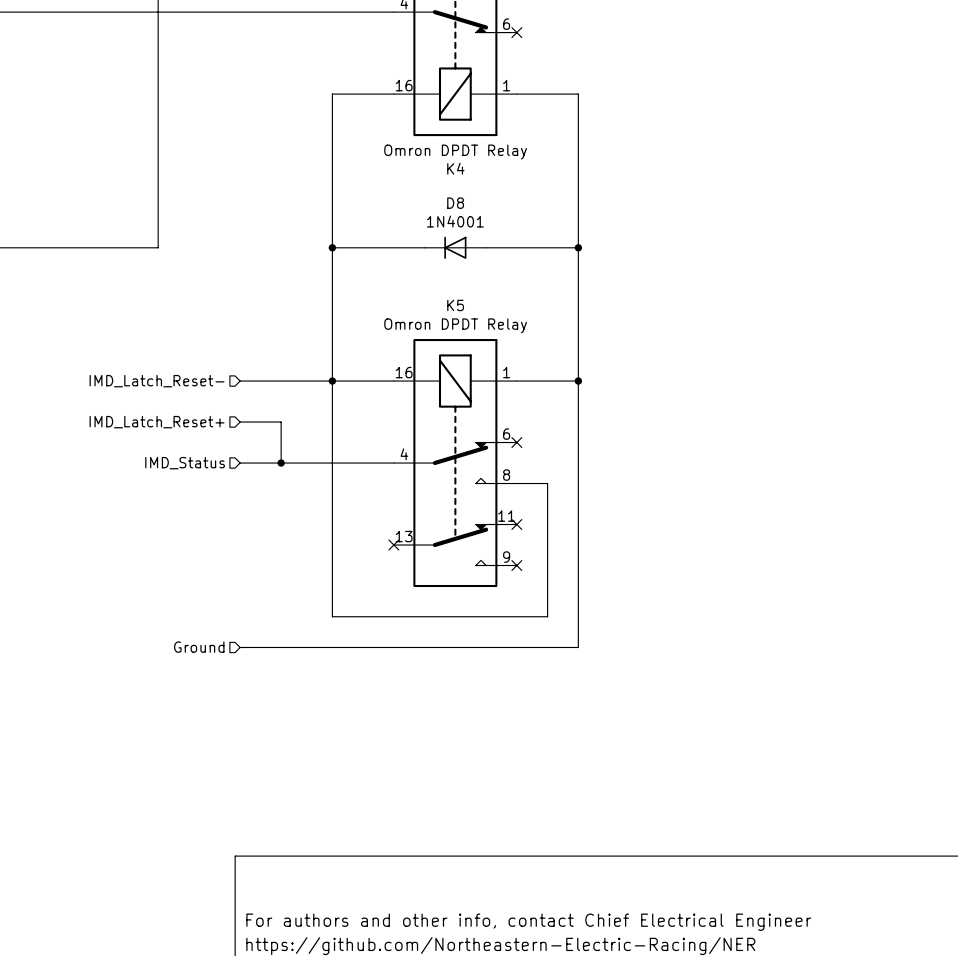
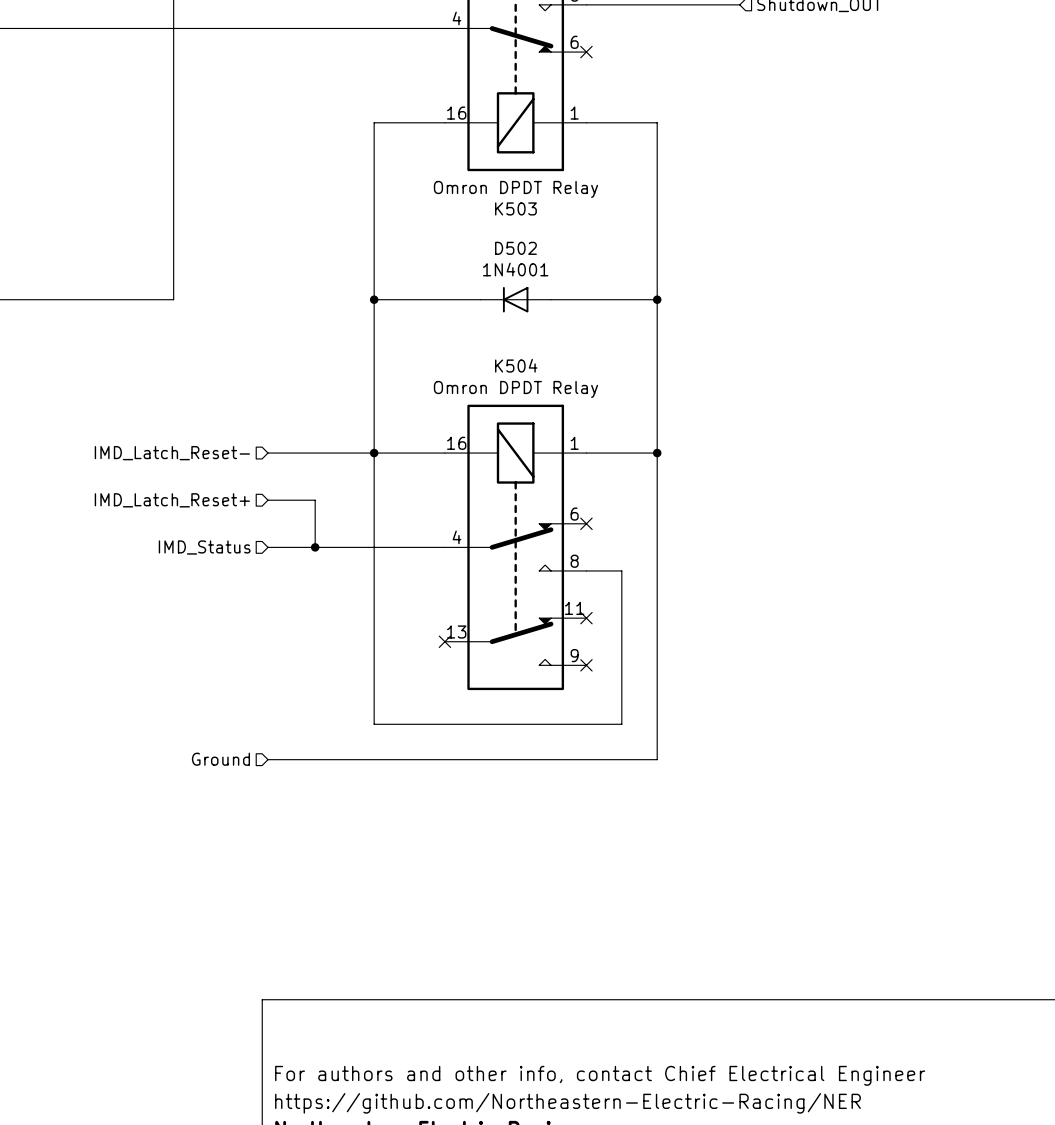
K4 name: K4 (455, 168) -> K503 (515, 208)
D8 name: D8 (455, 203) -> D502 (515, 248)
K5 name: K5 (455, 305) -> K504 (516, 365)

